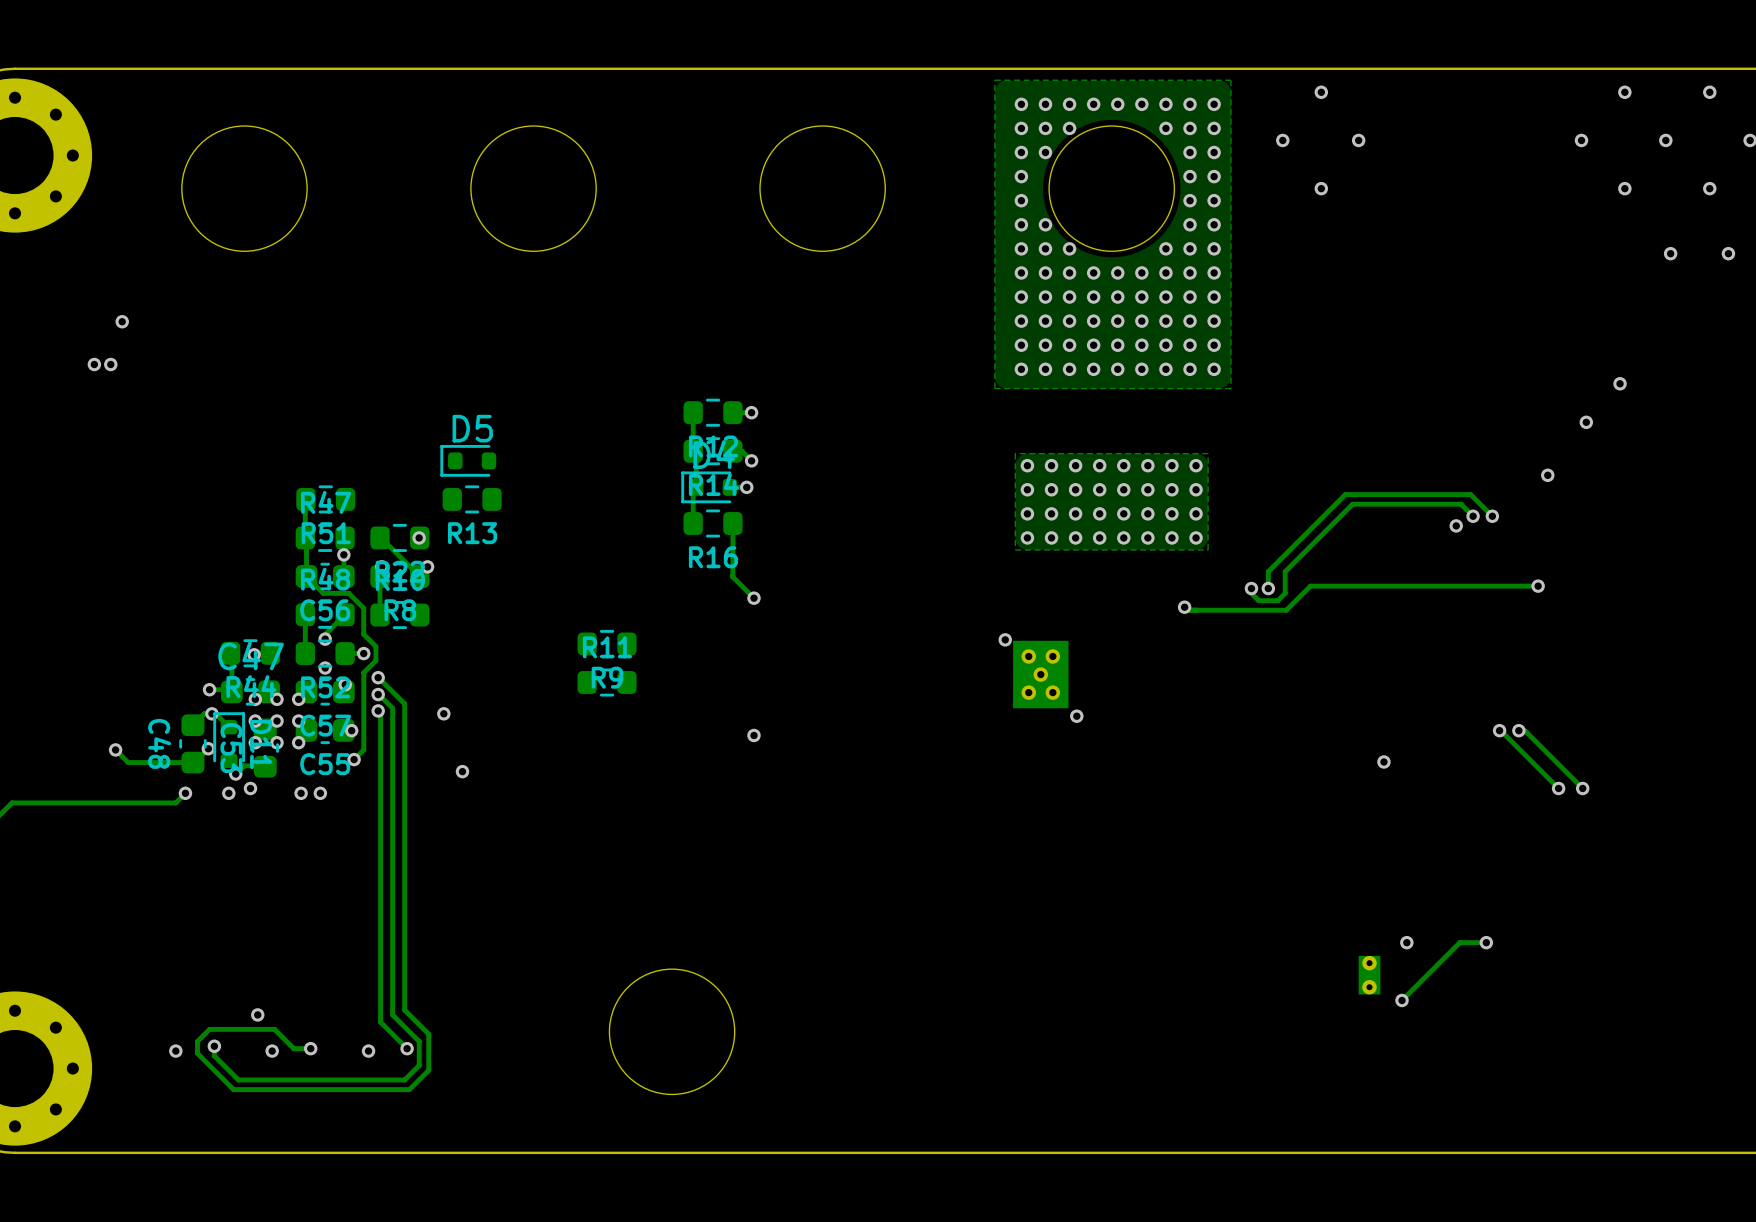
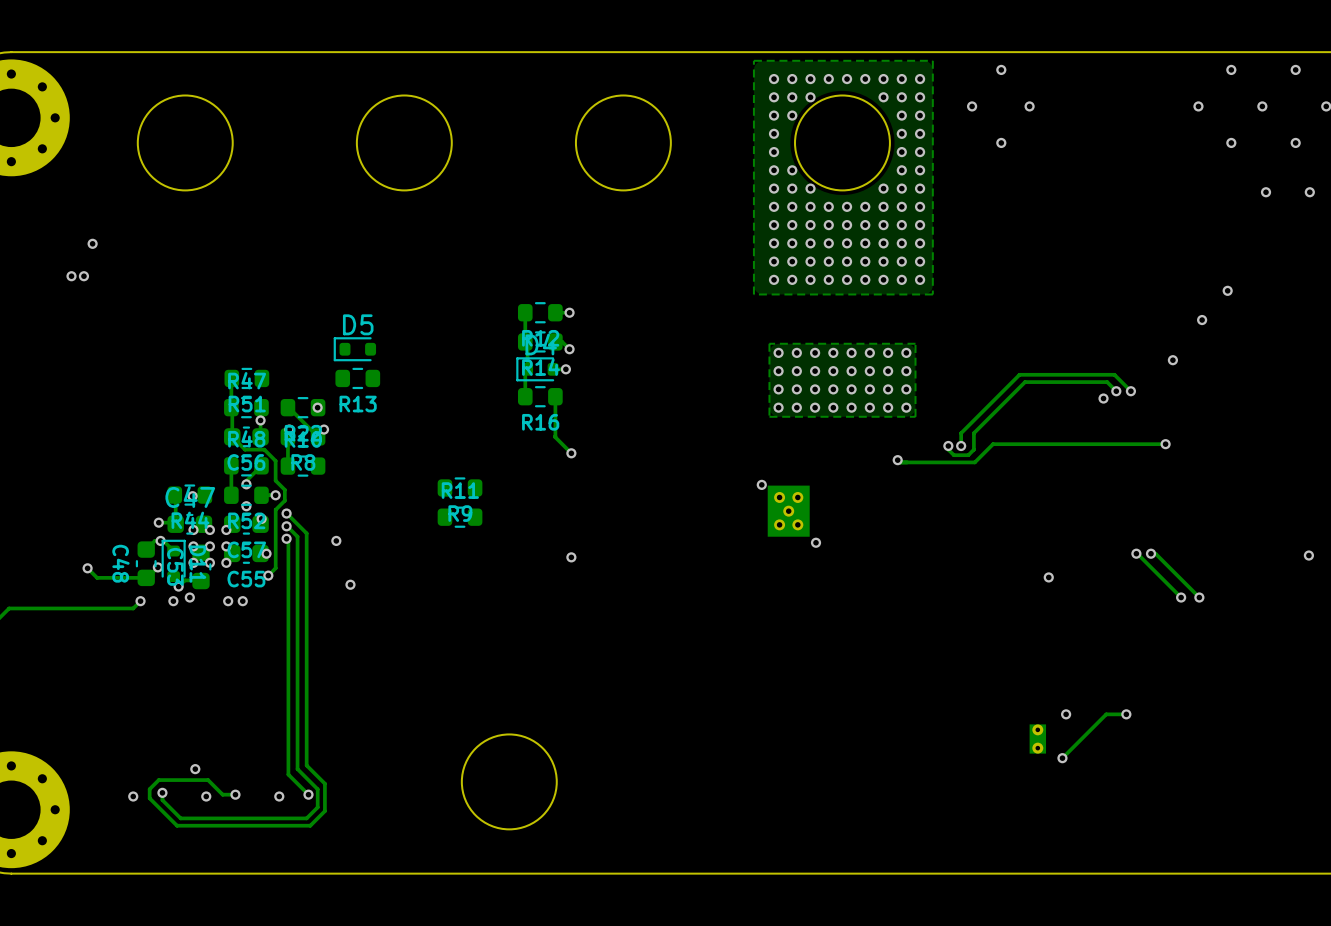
via: none -> (1308, 555)

